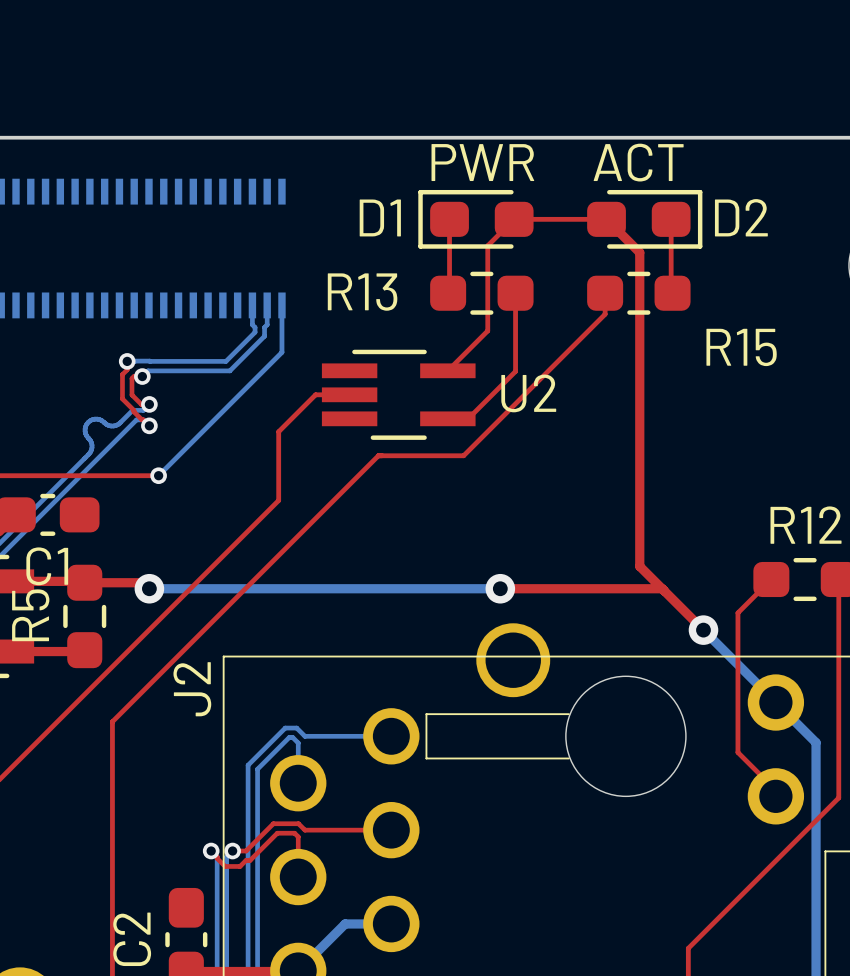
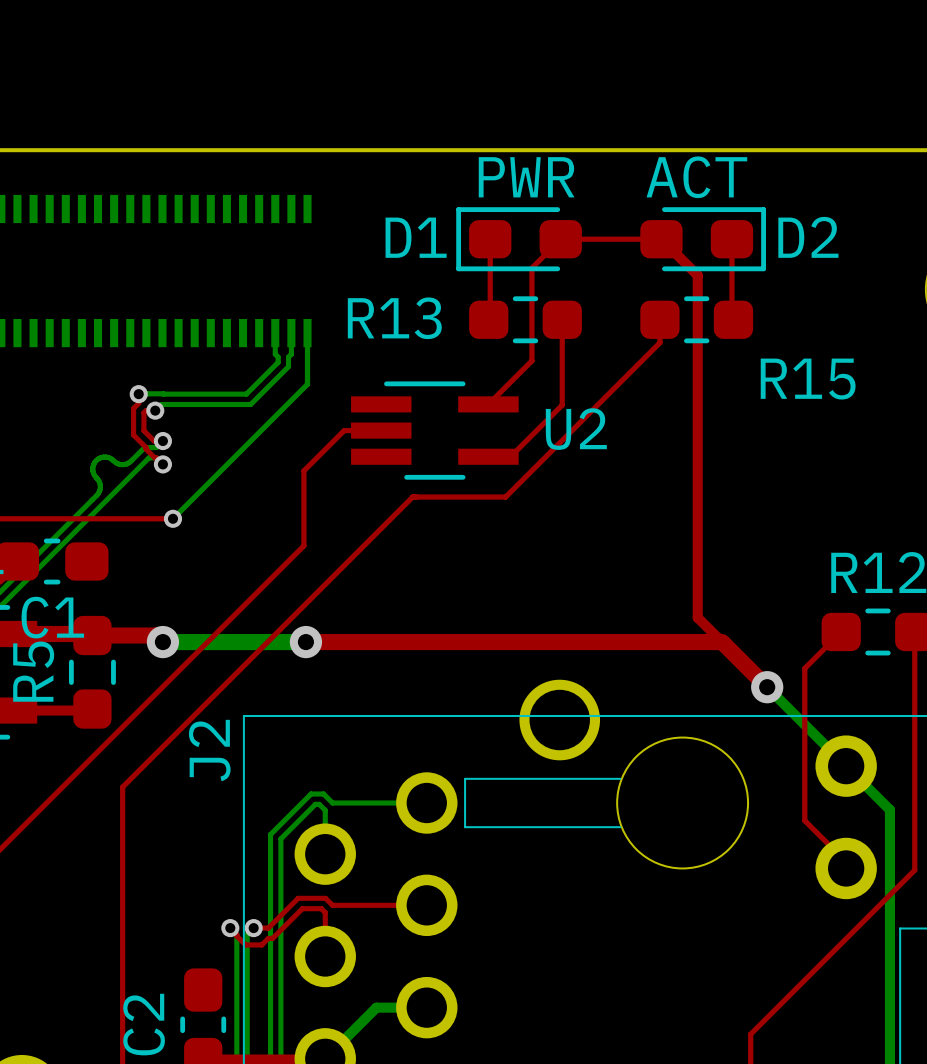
top track width: thin (14, 581) (143, 582) (149, 588) -> thick (15, 634) (156, 635) (162, 642)
bottom track width: thin (149, 588) (280, 588) -> thick (162, 642) (305, 642)
top track: none -> (305, 642) (545, 642)
bottom track: (280, 588) (500, 588) -> none
top track width: thin (500, 588) (662, 588) -> thick (545, 642) (722, 642)
via position: (500, 588) -> (305, 642)
top track width: thin (664, 590) (703, 630) -> thick (724, 644) (767, 687)

